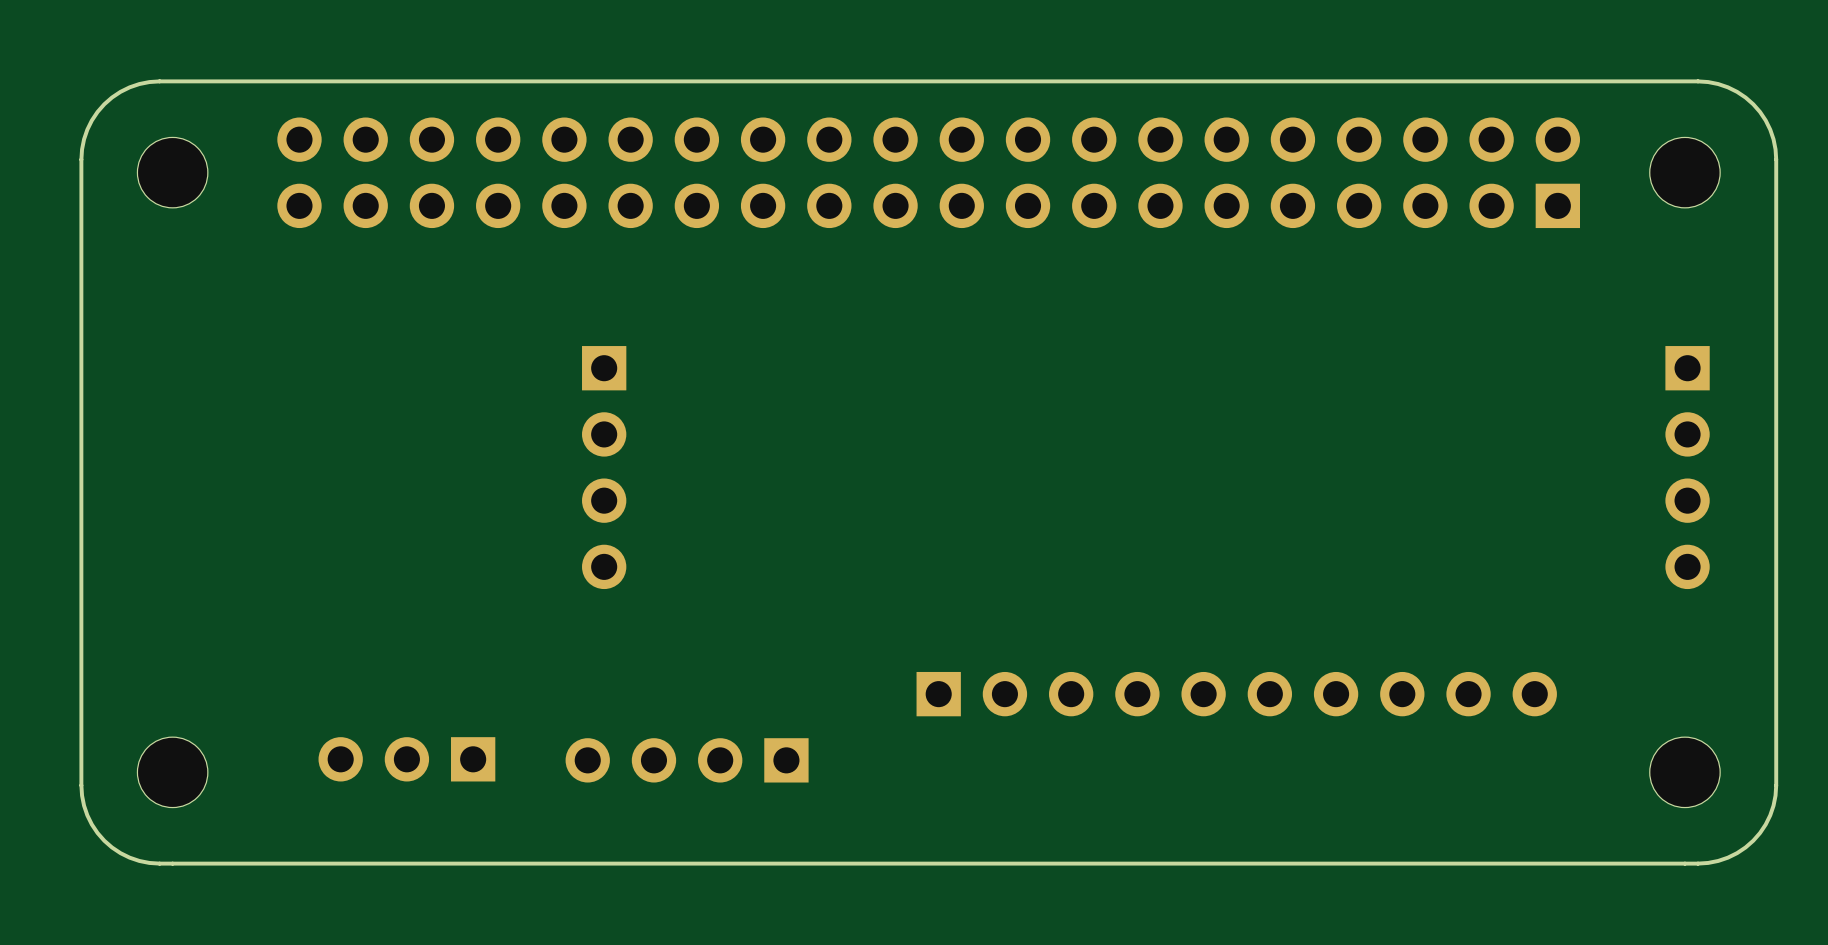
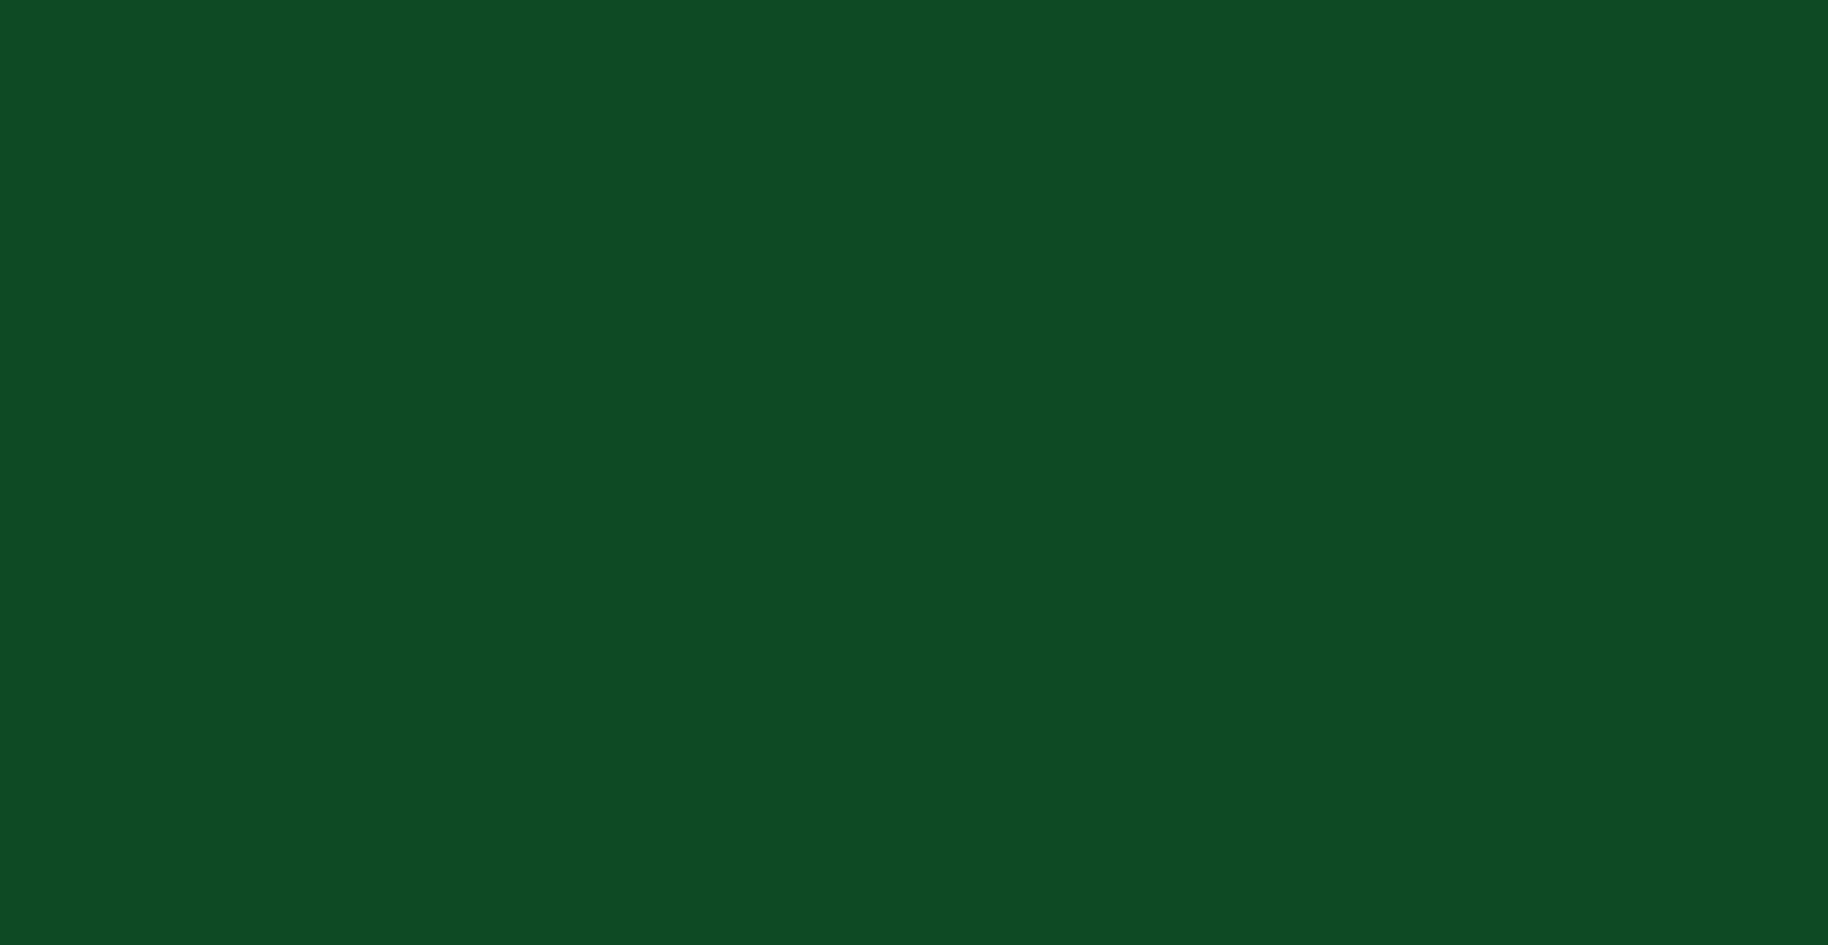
board edge: (1697, 81) (159, 81) (129, 87) (111, 97) (97, 111) (87, 129) (81, 159) (81, 785) (87, 815) (97, 833) (111, 847) (129, 857) (159, 863) (1697, 863) (1727, 857) (1745, 847) (1760, 833) (1770, 815) (1775, 795) (1776, 159) (1770, 129) (1753, 104) (1727, 87) (1697, 81) -> none
part: (172, 172) -> none
part: (928, 172) -> none
part: (1684, 172) -> none
part: (604, 467) -> none
part: (1687, 467) -> none
part: (1236, 694) -> none
part: (406, 759) -> none
part: (687, 760) -> none
part: (172, 772) -> none
part: (1684, 772) -> none

